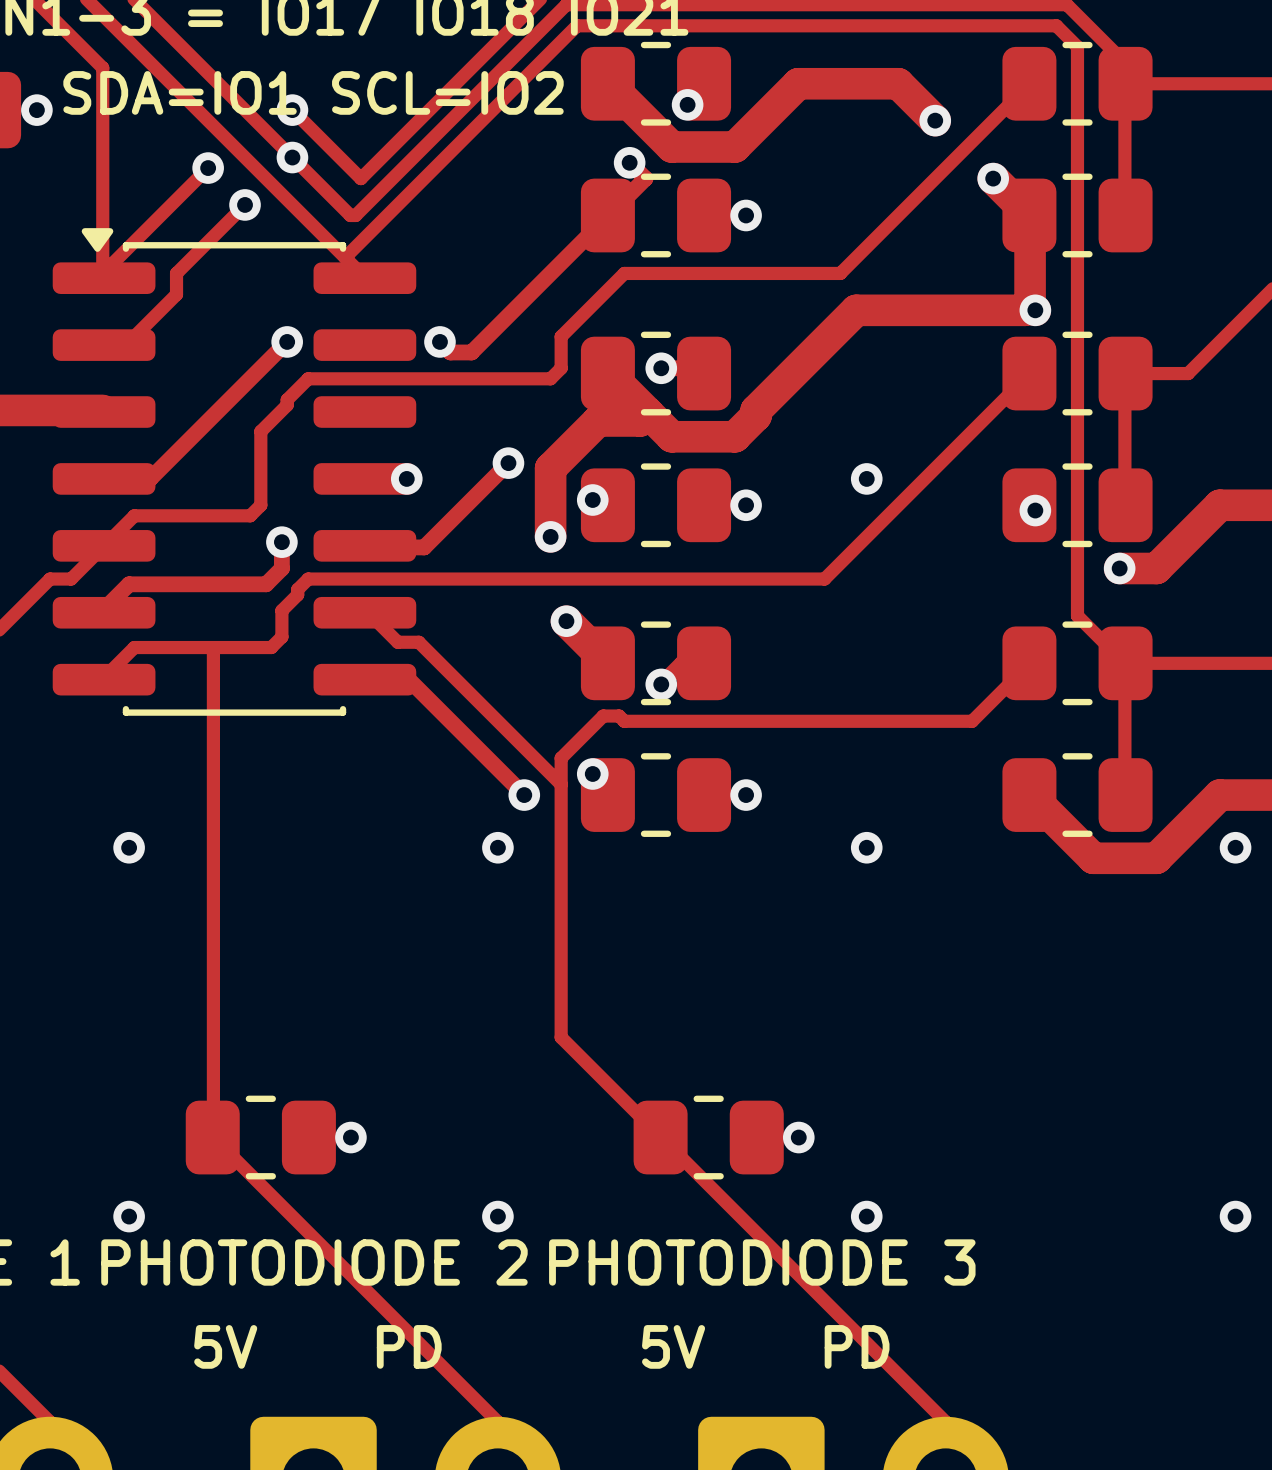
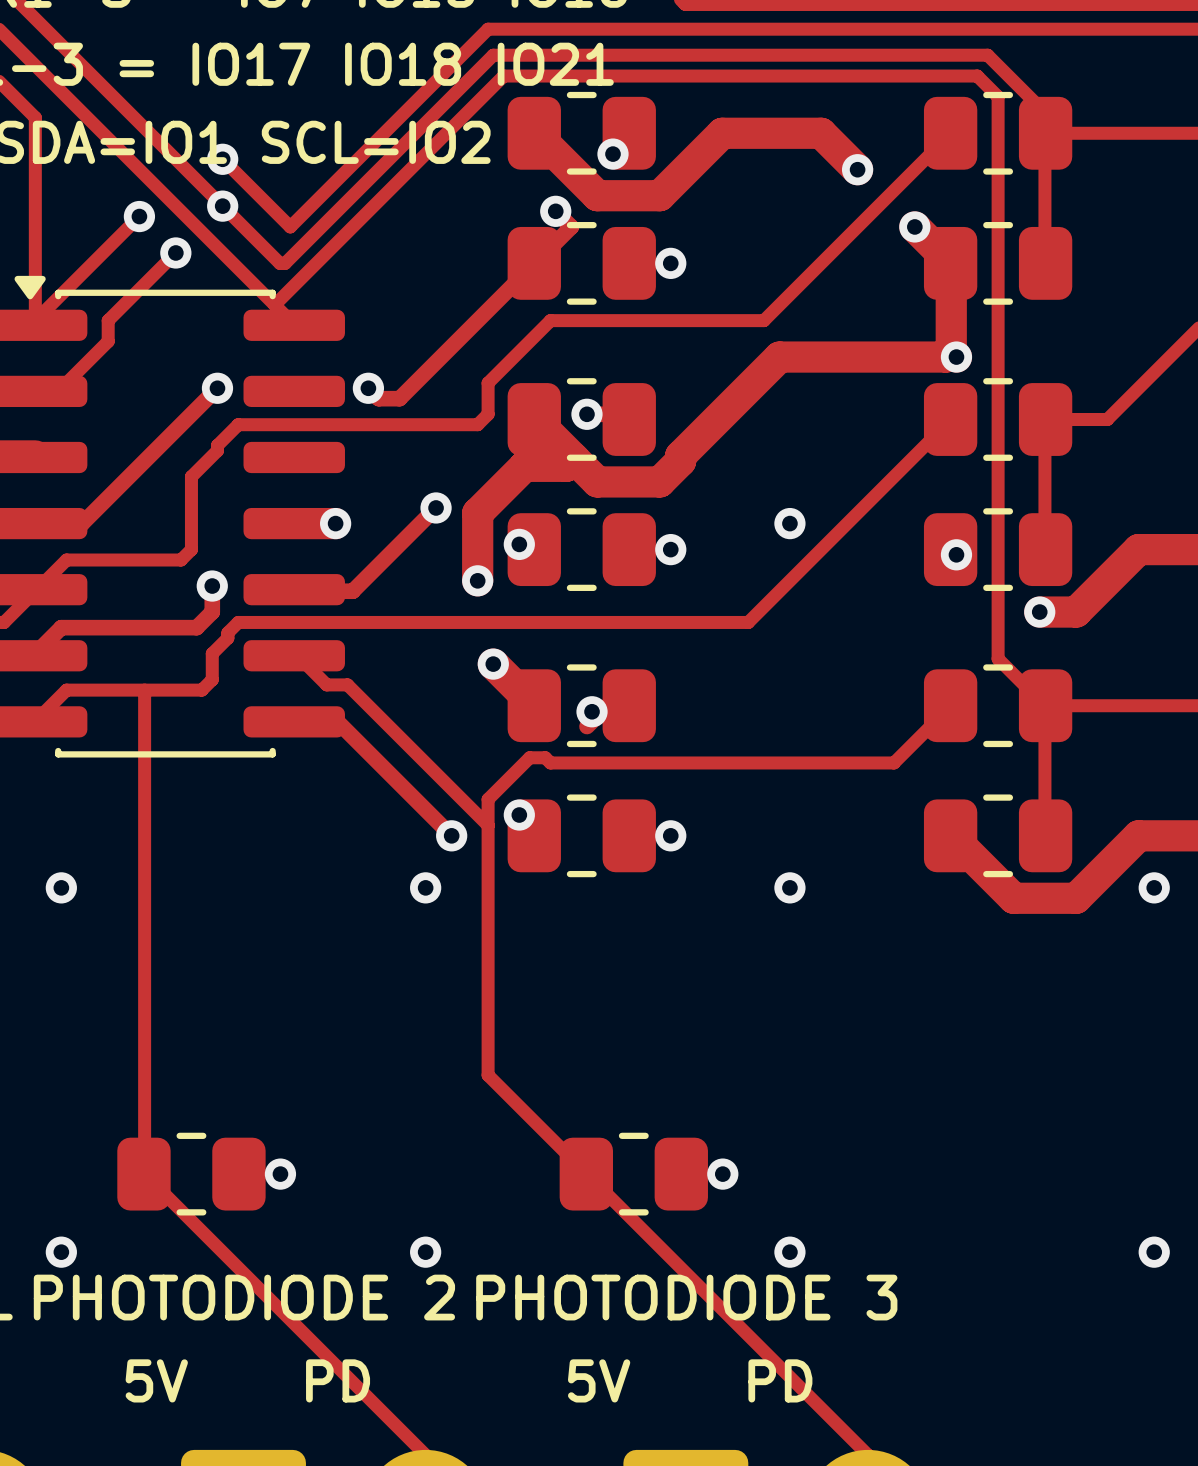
via position: (661, 684) -> (592, 711)

